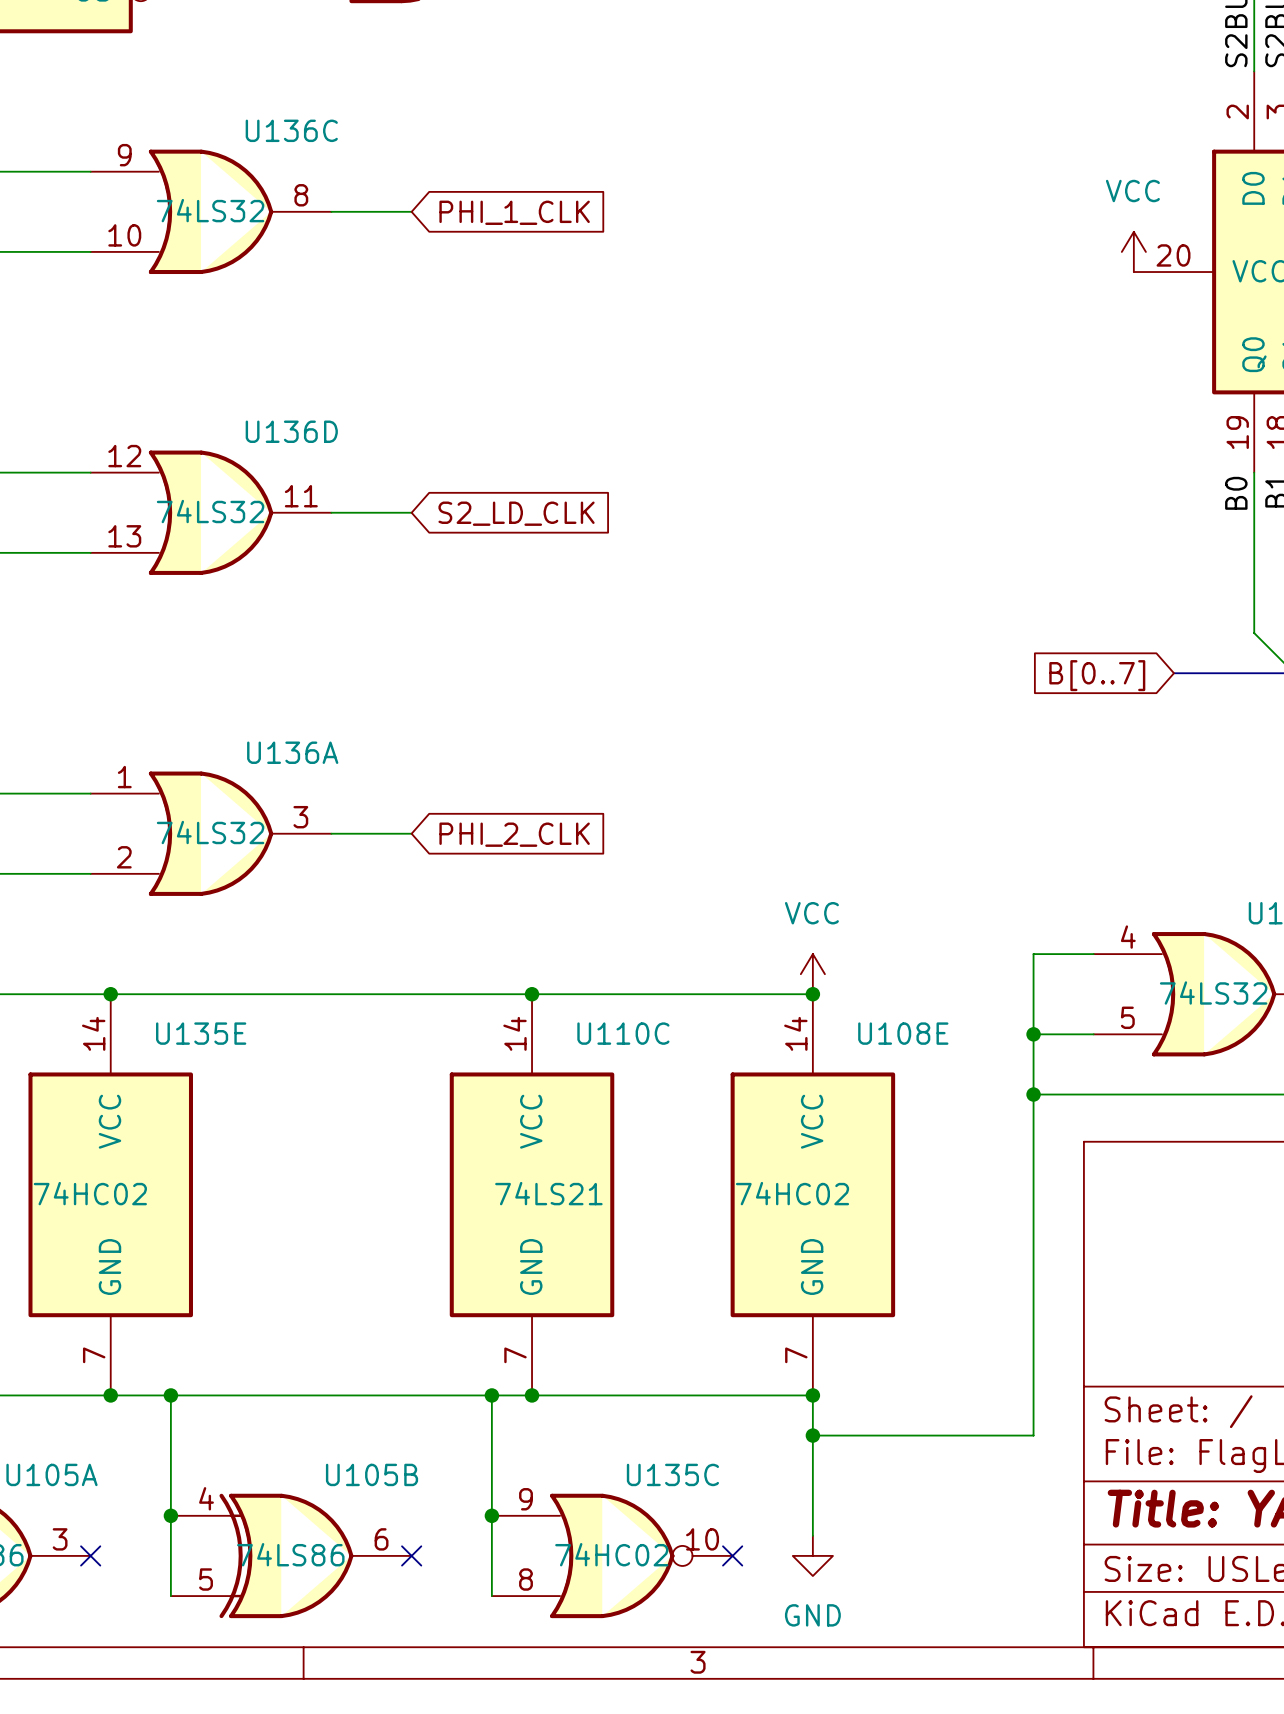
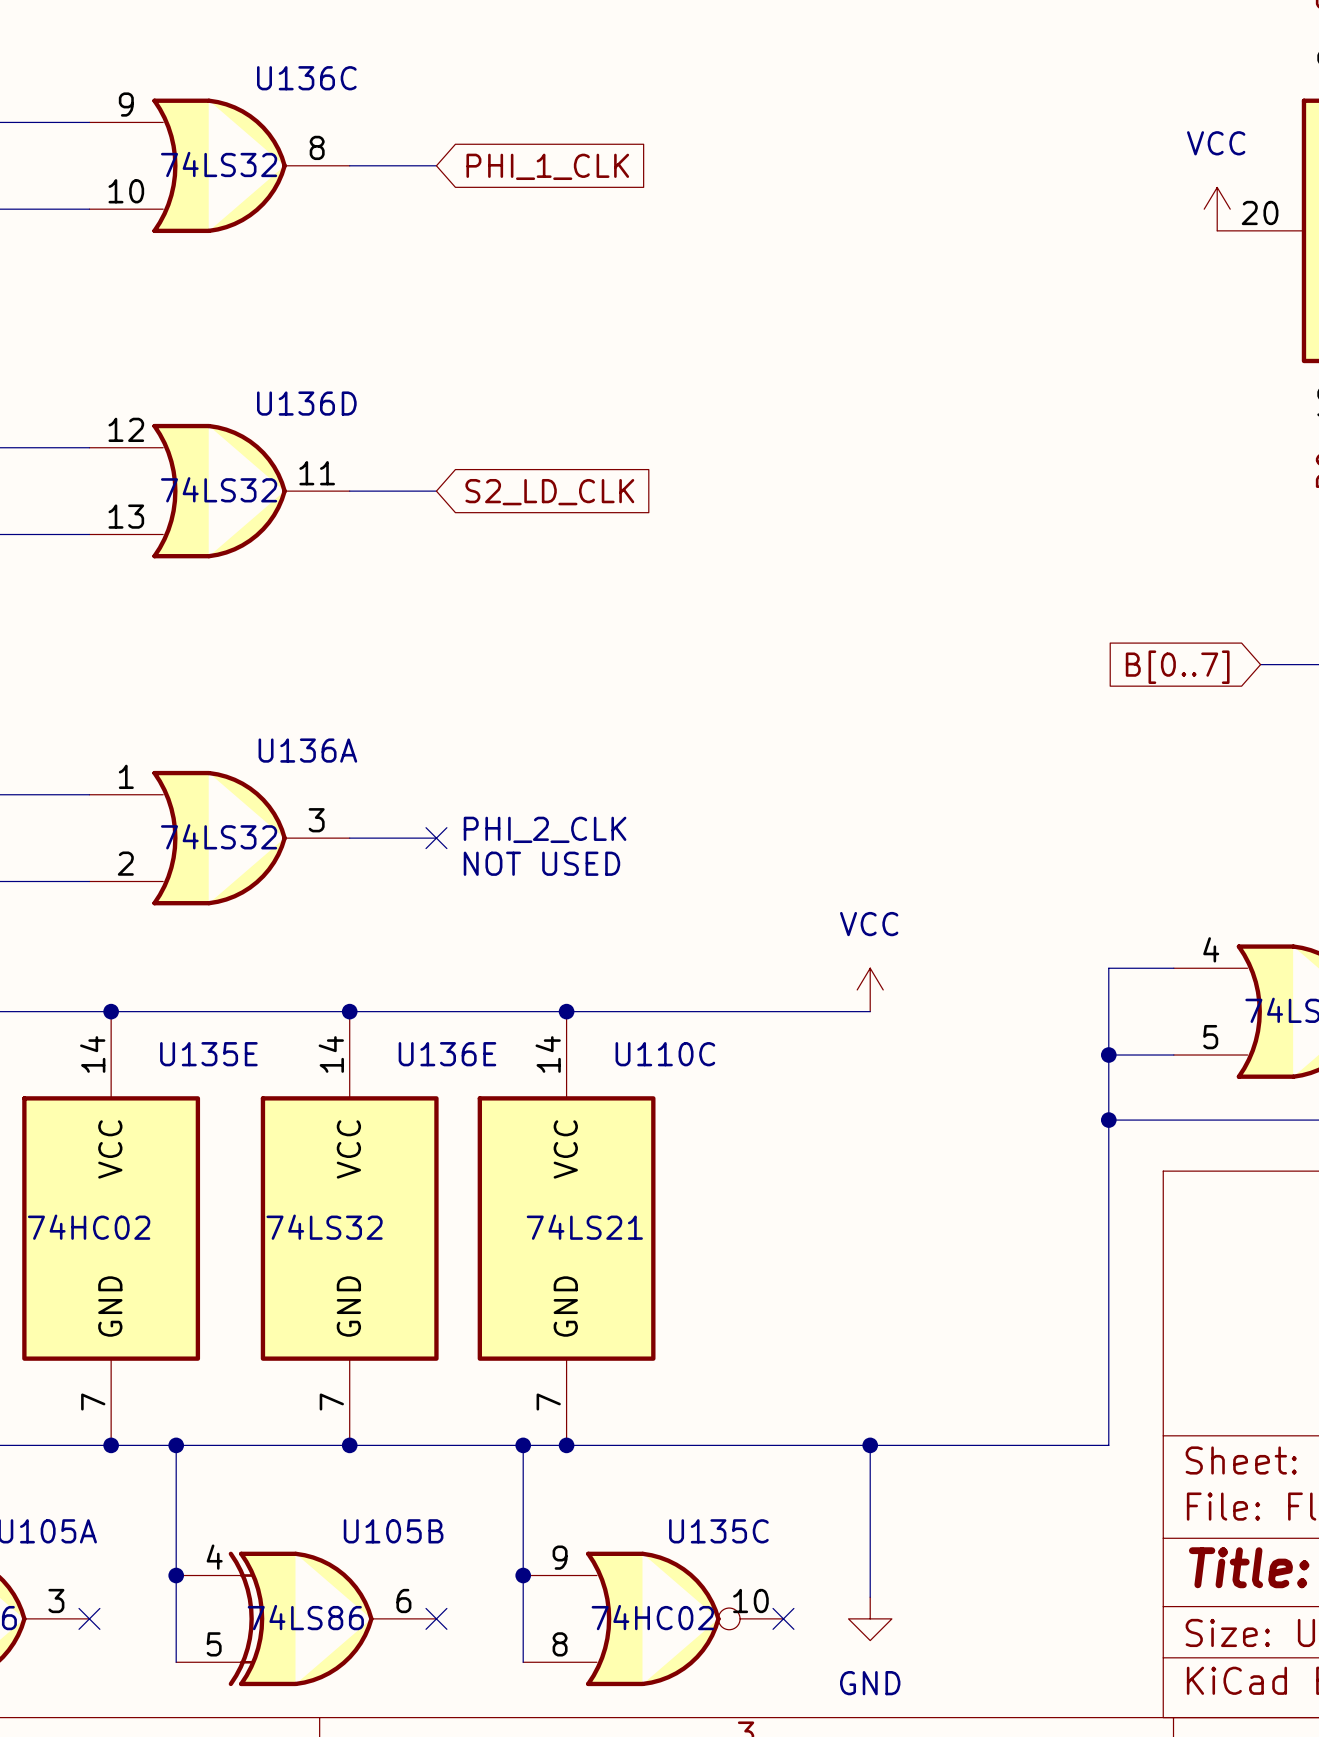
text: none -> PHI_2_CLK (545, 829)
no-connect mark: none -> (436, 838)
global label: PHI_2_CLK (514, 834) -> none
text: none -> NOT USED (541, 863)
junction: none -> (349, 1011)
junction: (812, 994) -> none
U136E: none -> 74LS32 (349, 1228)
U108E: 74HC02 (812, 1194) -> none
junction: none -> (349, 1445)
wire: (1033, 1395) (1033, 1435) (812, 1435) -> (1108, 1445) (870, 1445)
junction: (812, 1435) -> none

